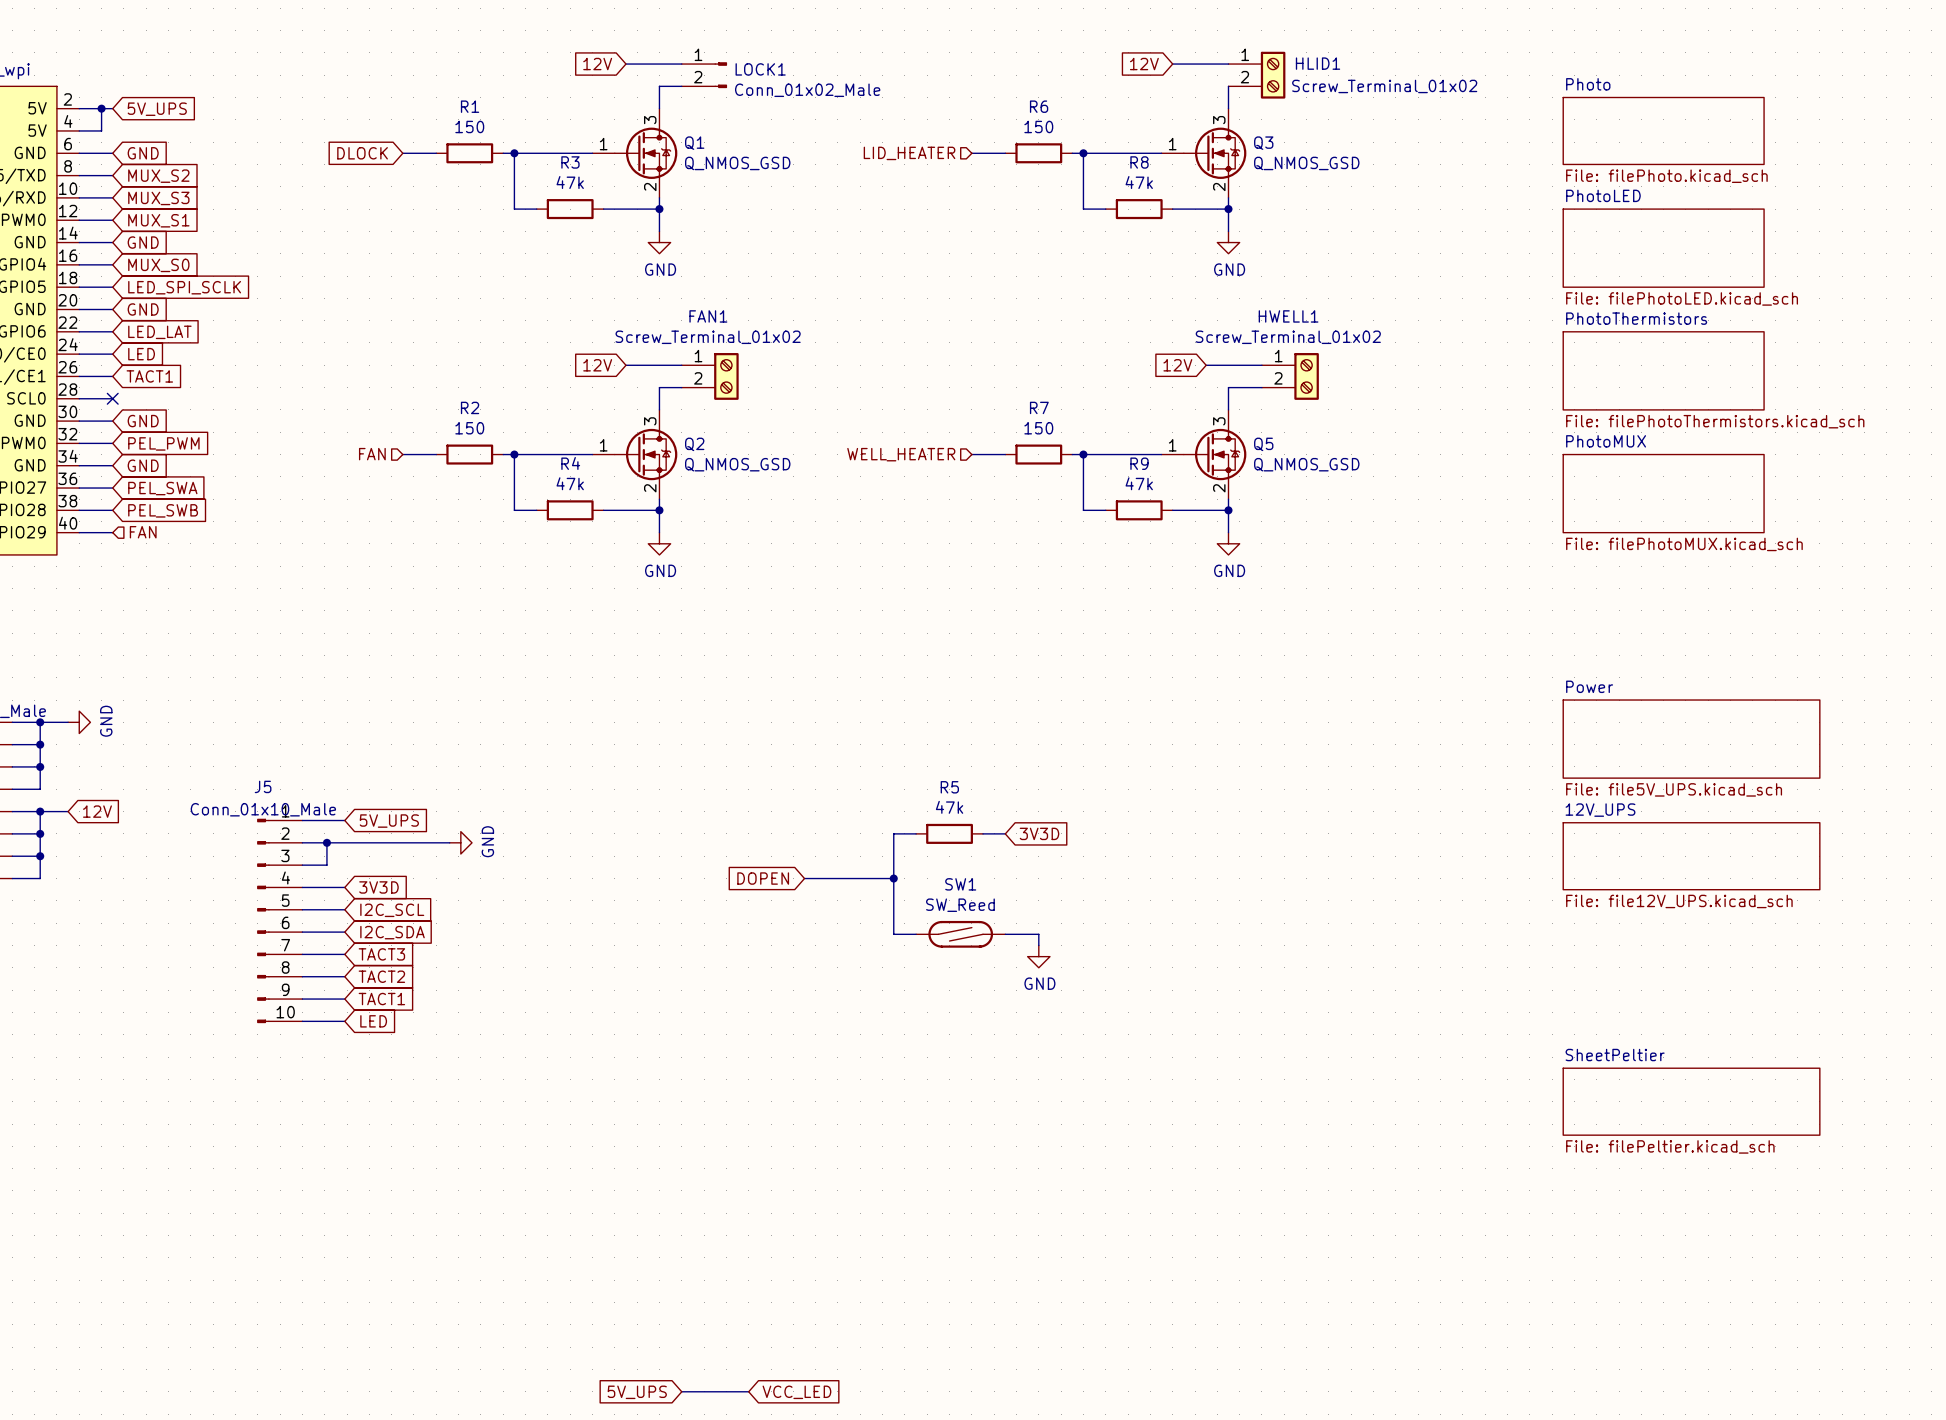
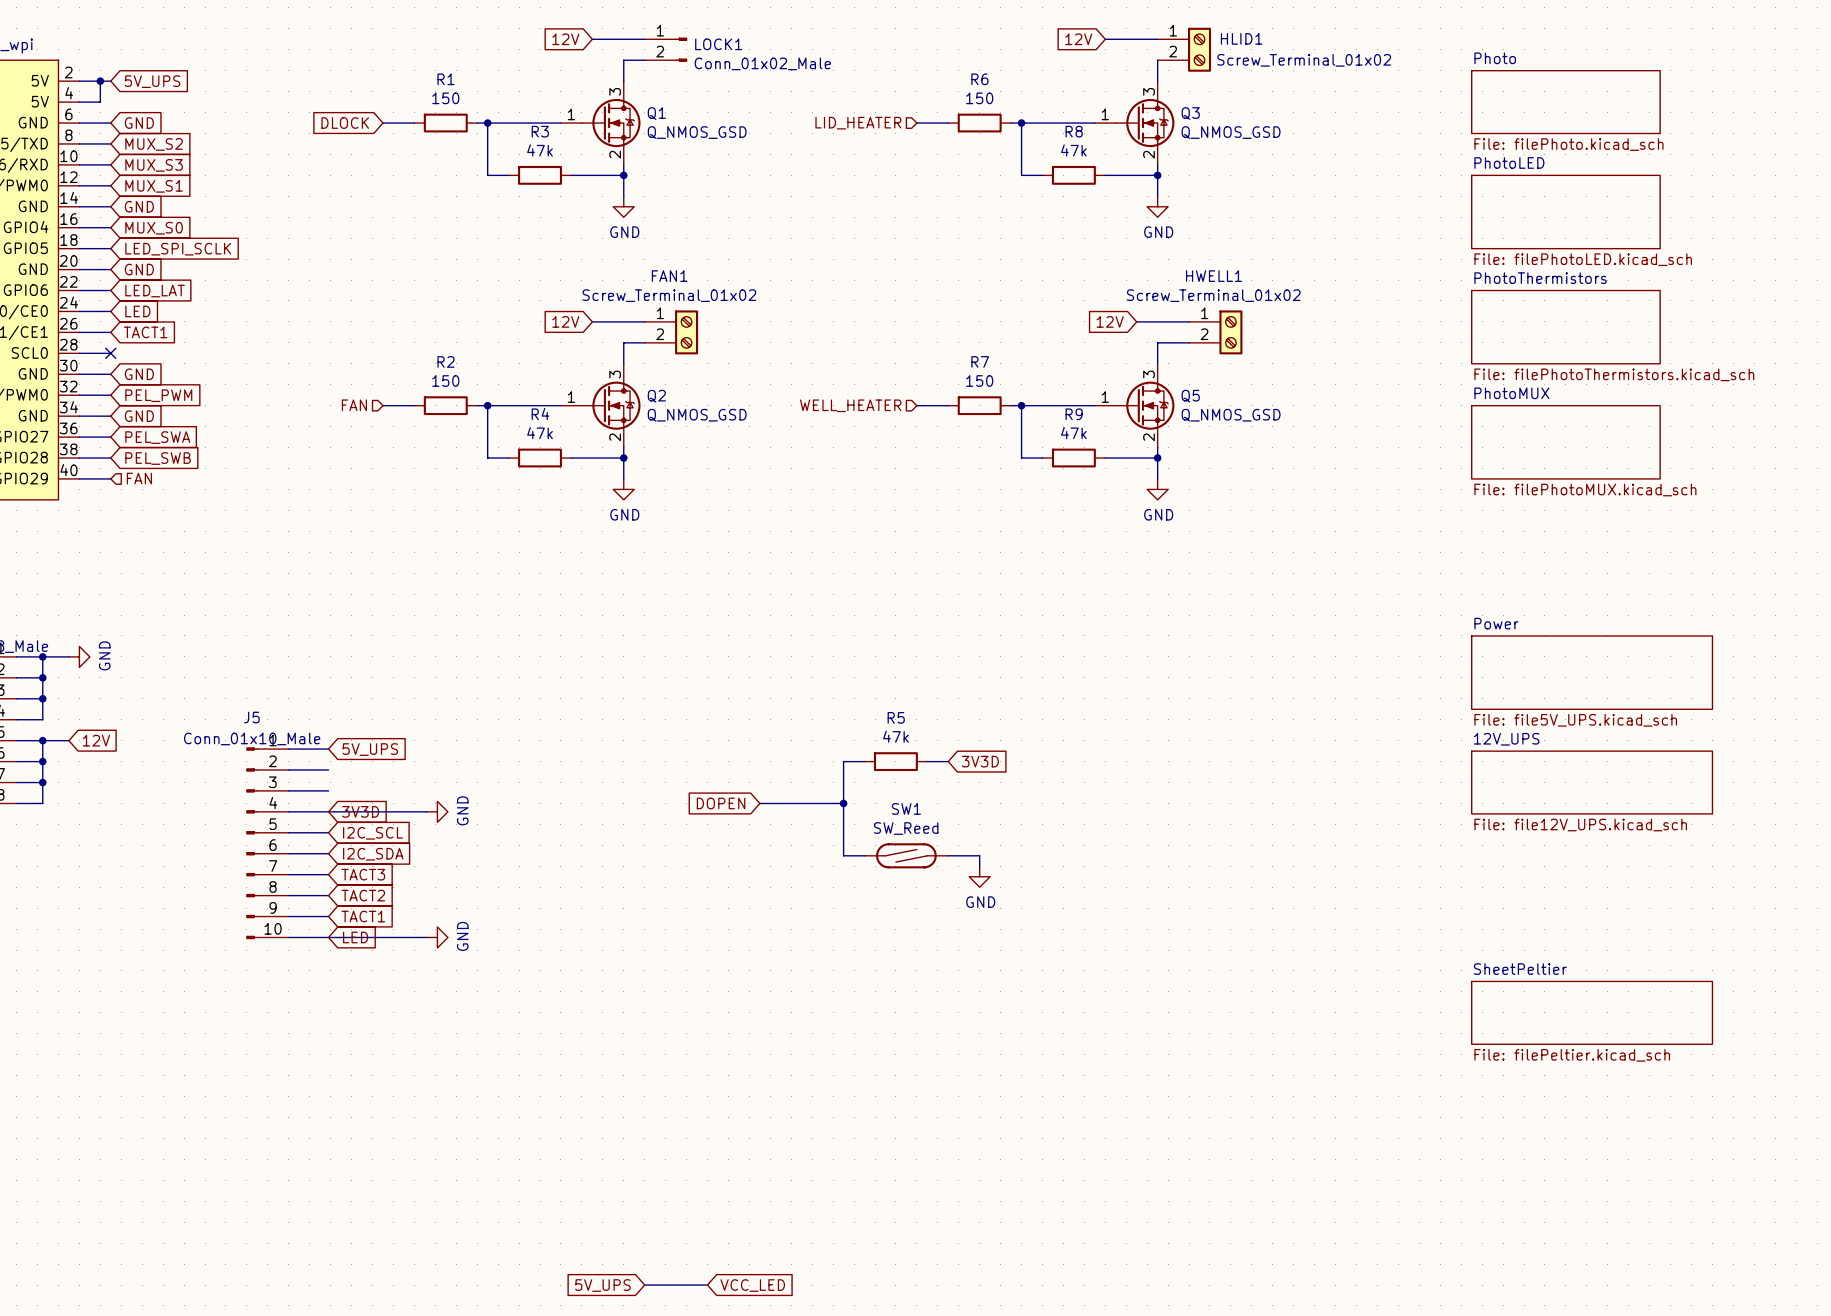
wire: (326, 842) (326, 865) -> (328, 790) (311, 790)
junction: (326, 842) -> none
wire: (344, 842) (449, 842) -> (328, 811) (426, 811)
power symbol position: GND (460, 842) -> GND (437, 811)
wire: none -> (328, 937) (426, 937)
power symbol: none -> GND (437, 937)

